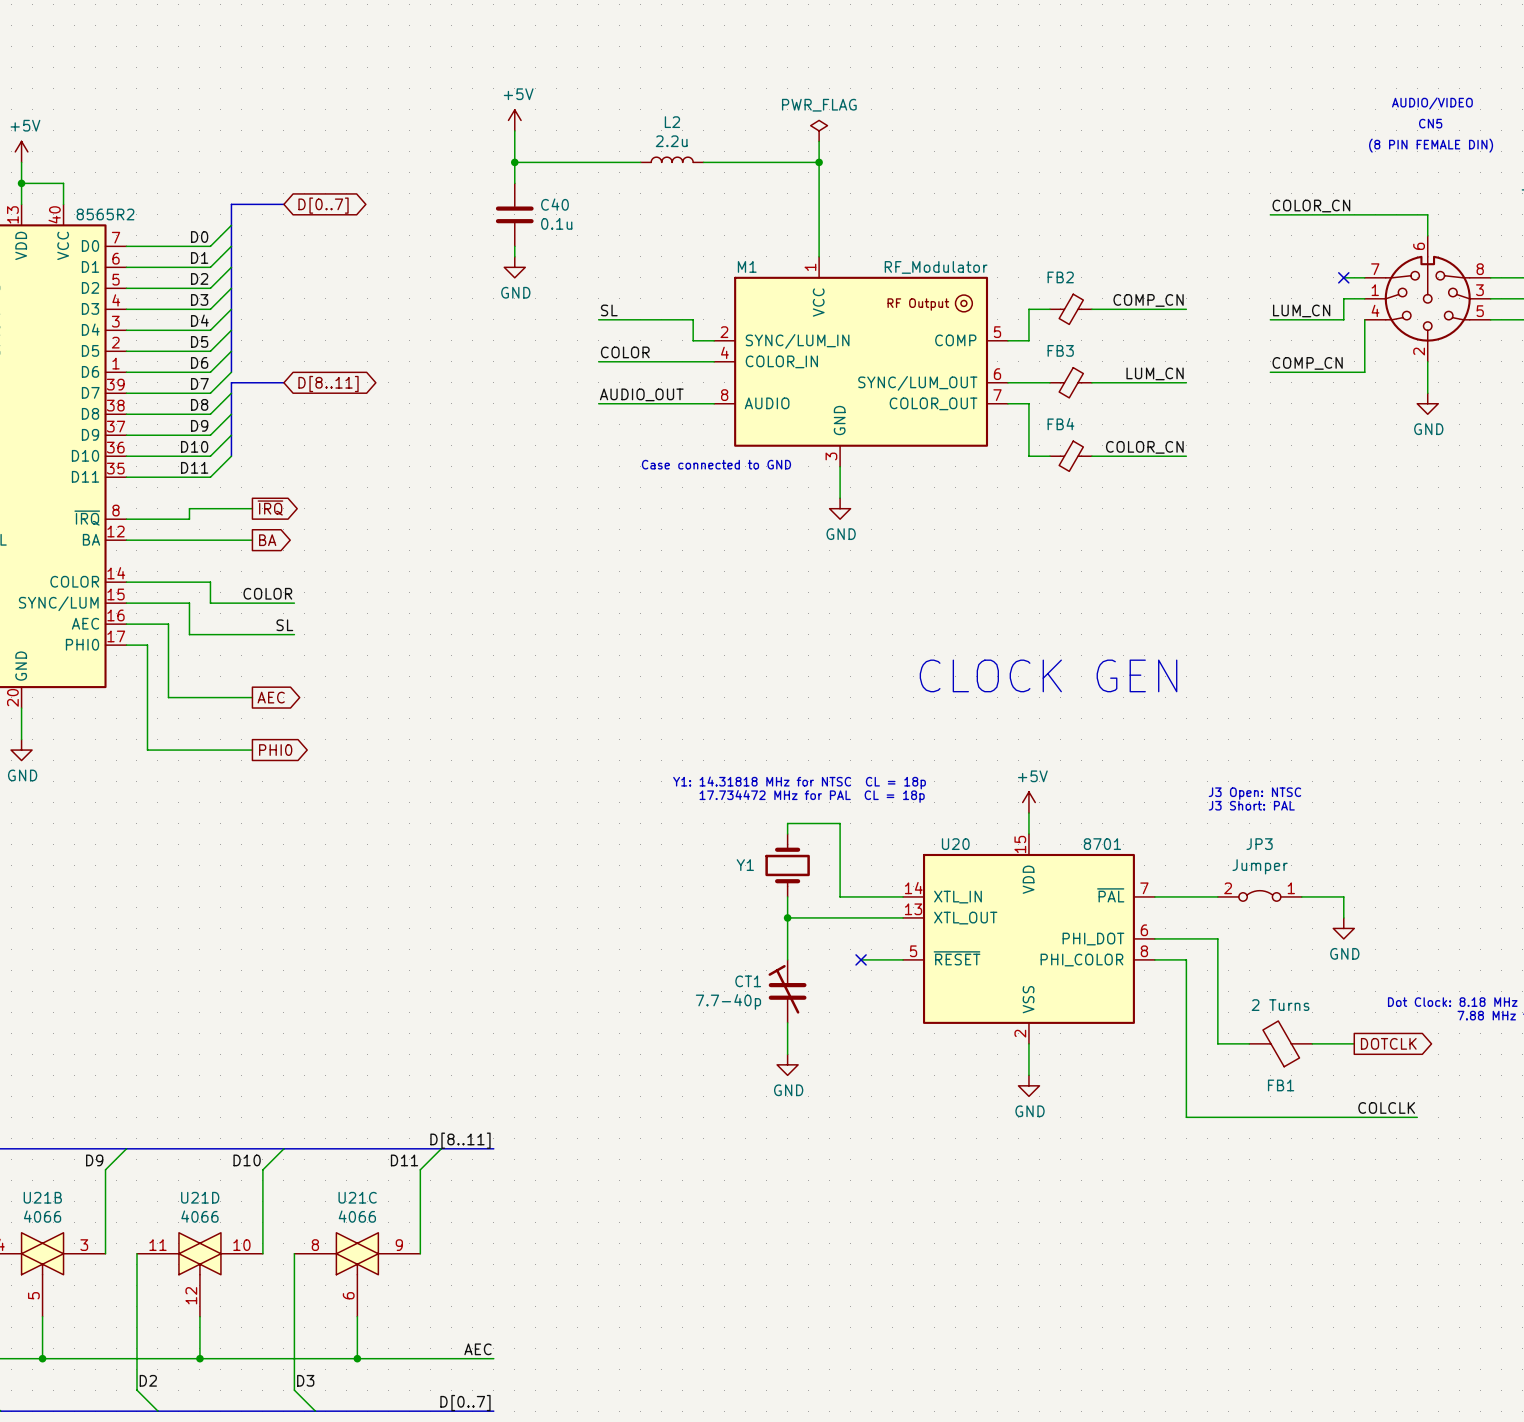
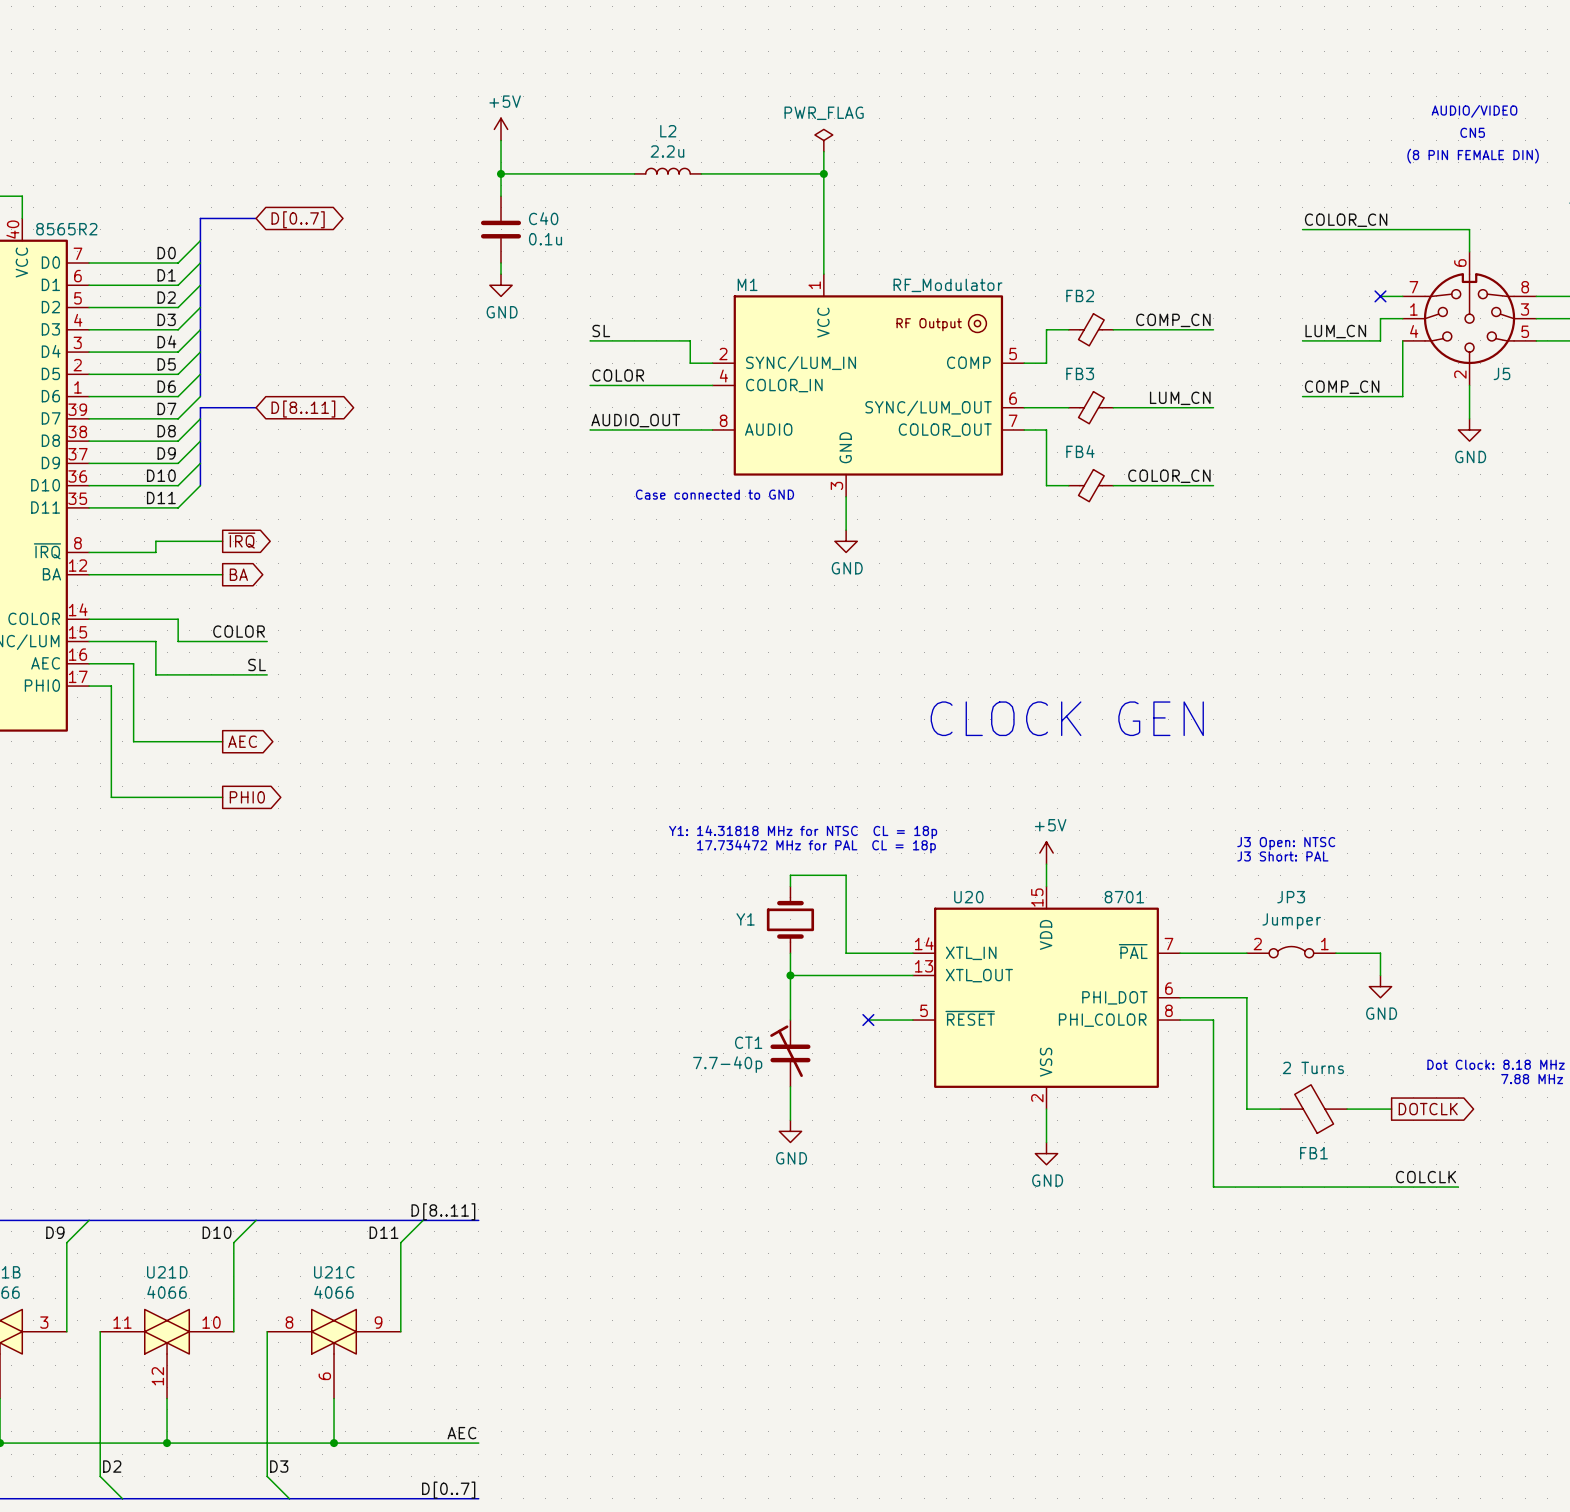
J5 name: none -> J5 (1501, 373)

